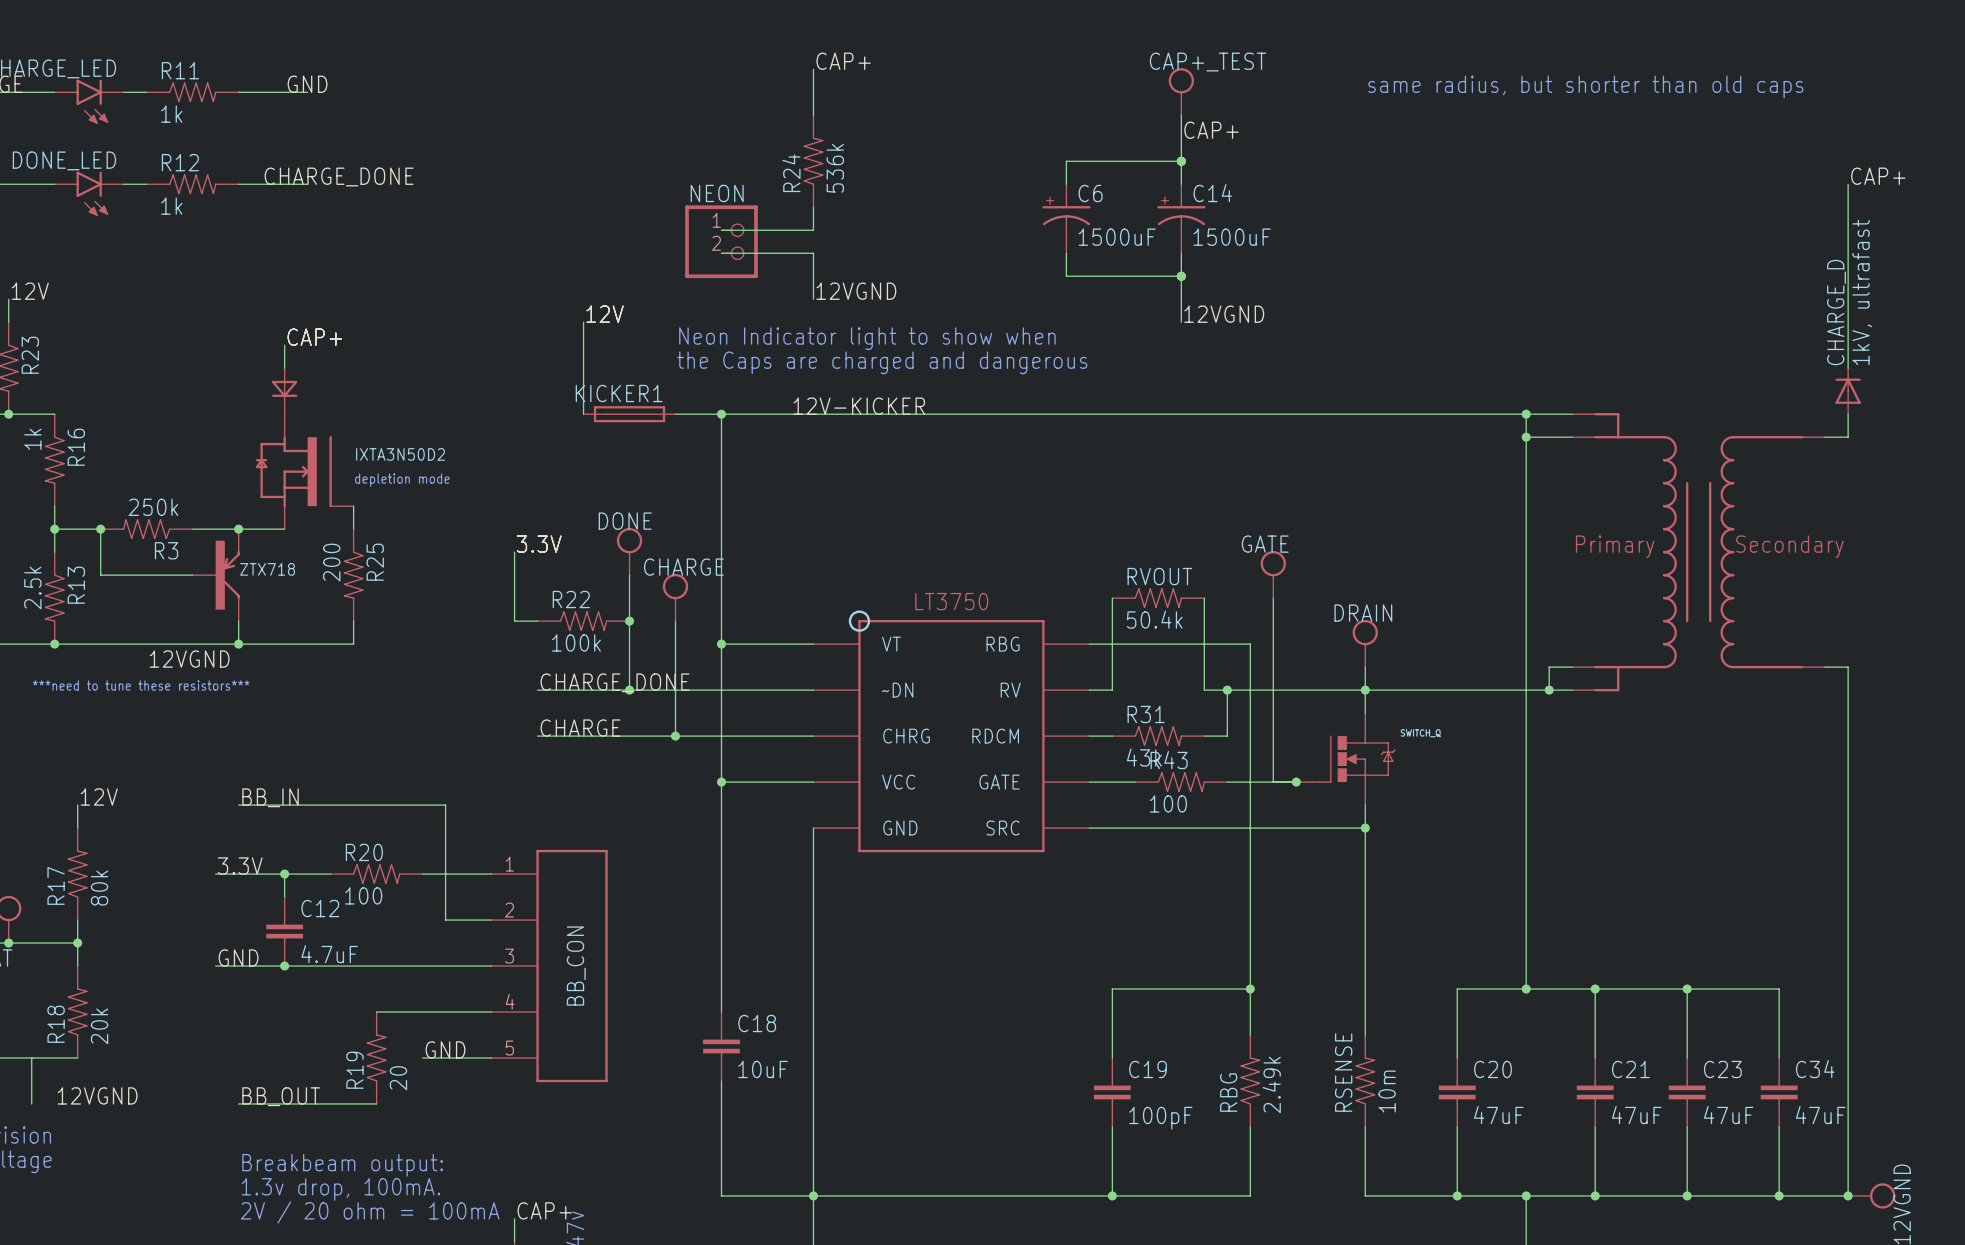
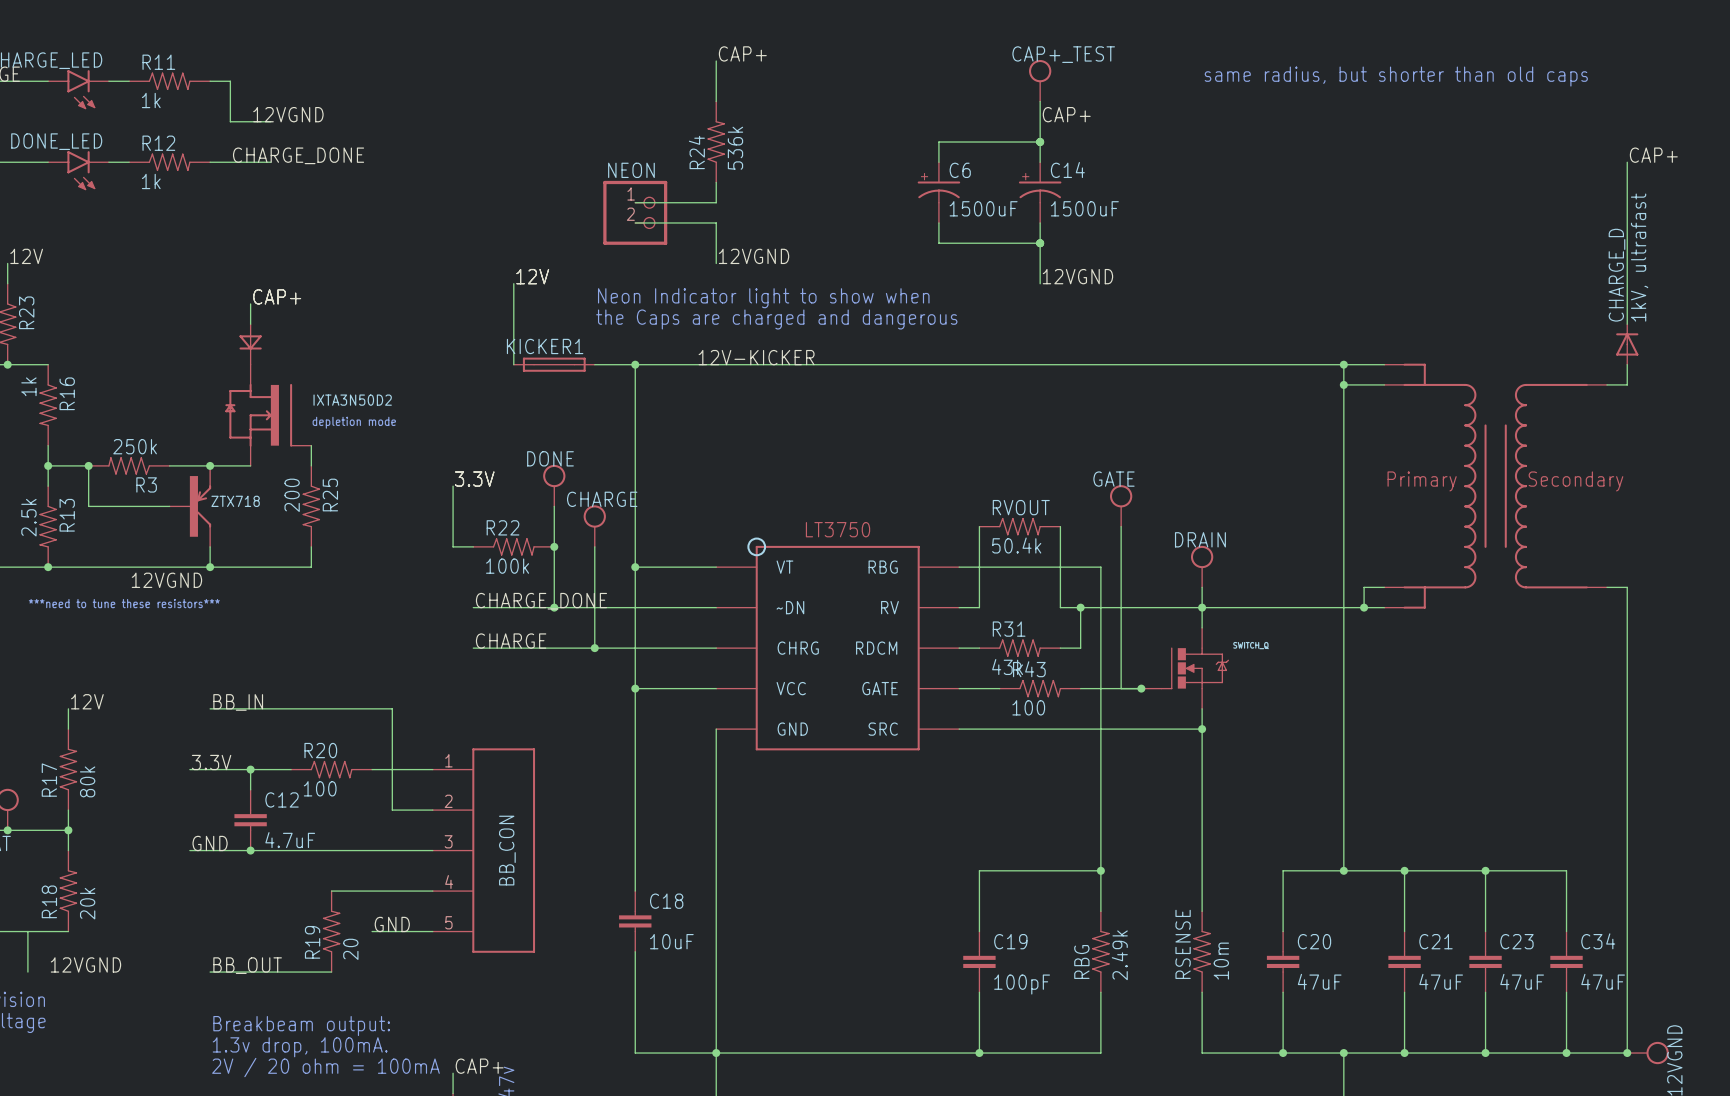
label: GND (307, 84) -> none
wire: (261, 92) (307, 92) -> (230, 81) (230, 121) (270, 121)
label: none -> 12VGND (288, 114)

